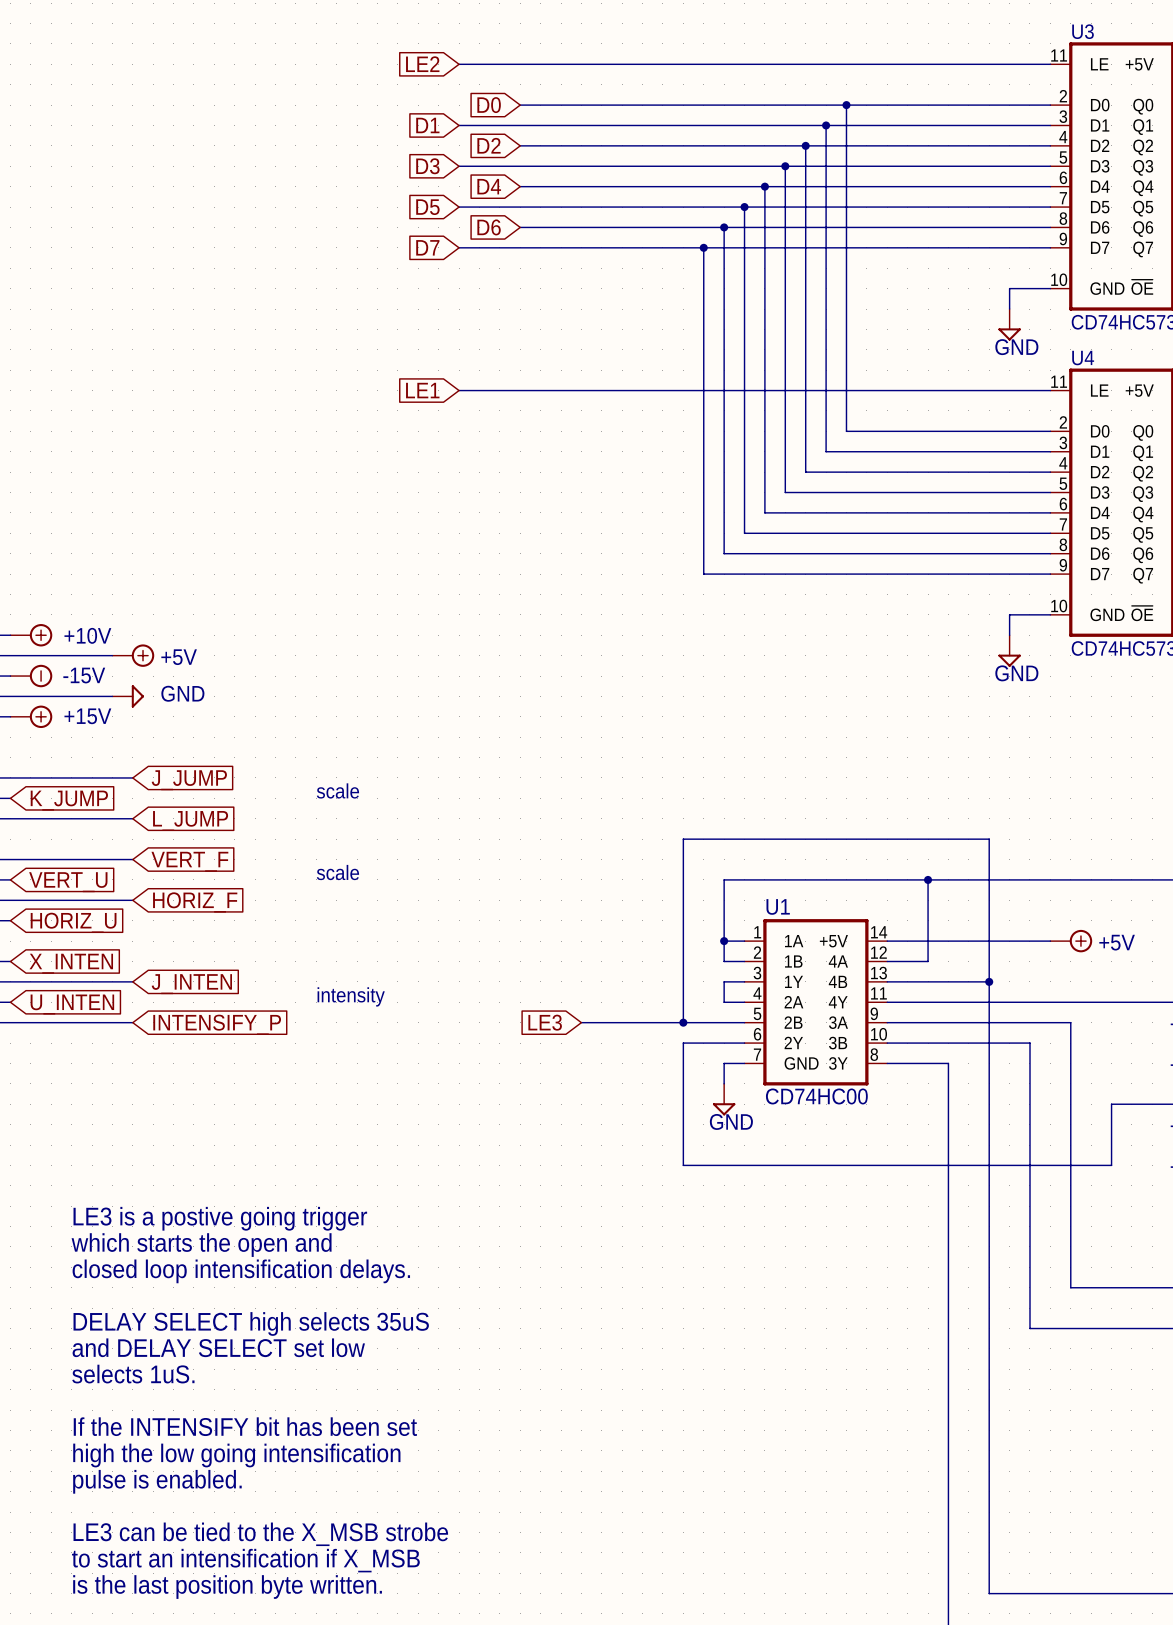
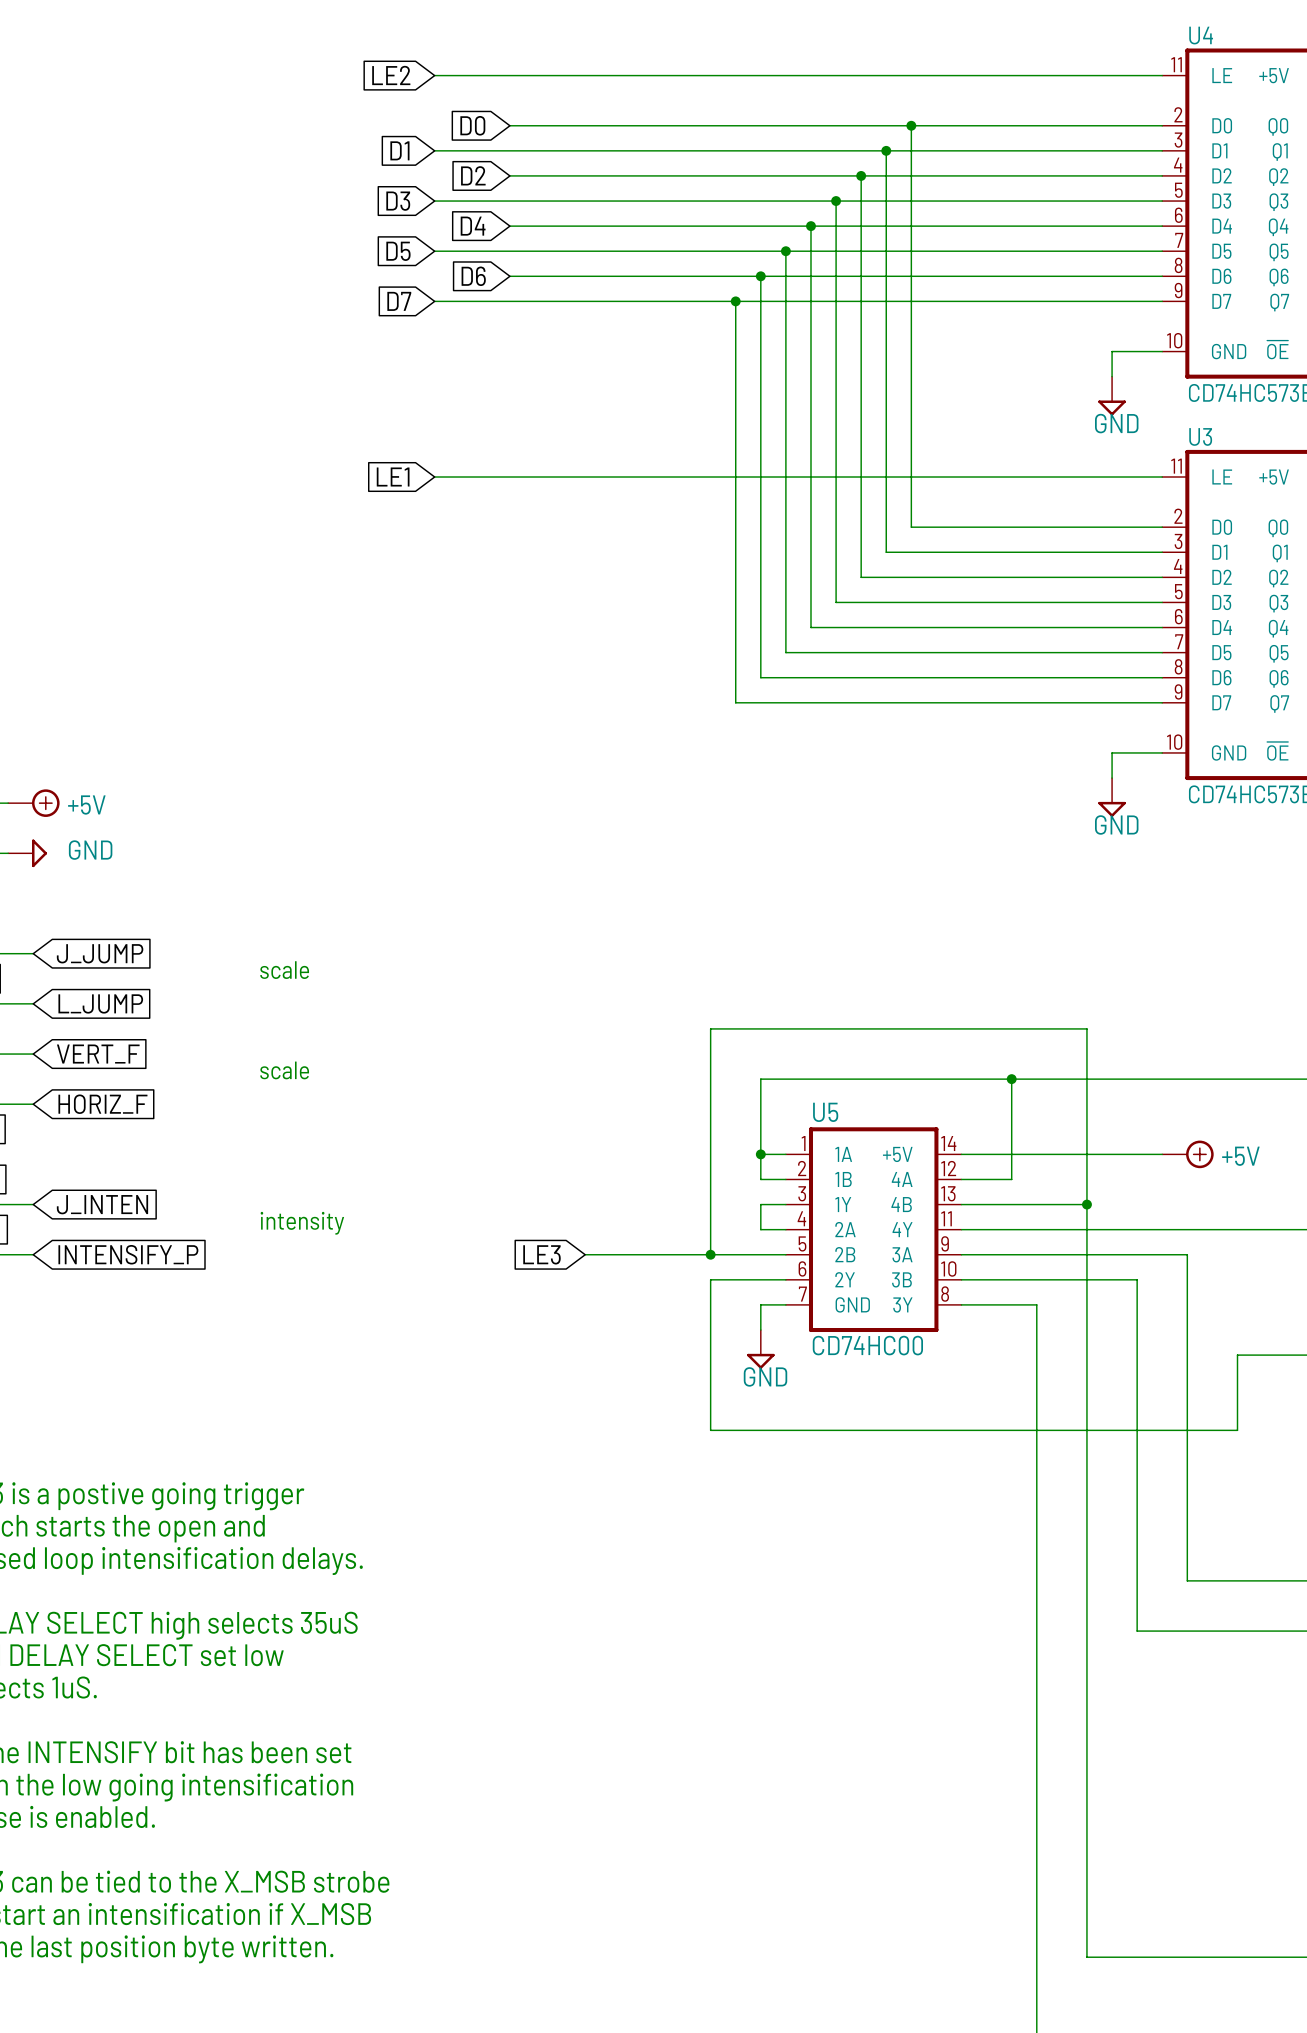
U3 name: U3 (1083, 31) -> U4 (1201, 35)
U4 name: U4 (1083, 358) -> U3 (1200, 436)
U1 name: U1 (778, 906) -> U5 (825, 1112)

